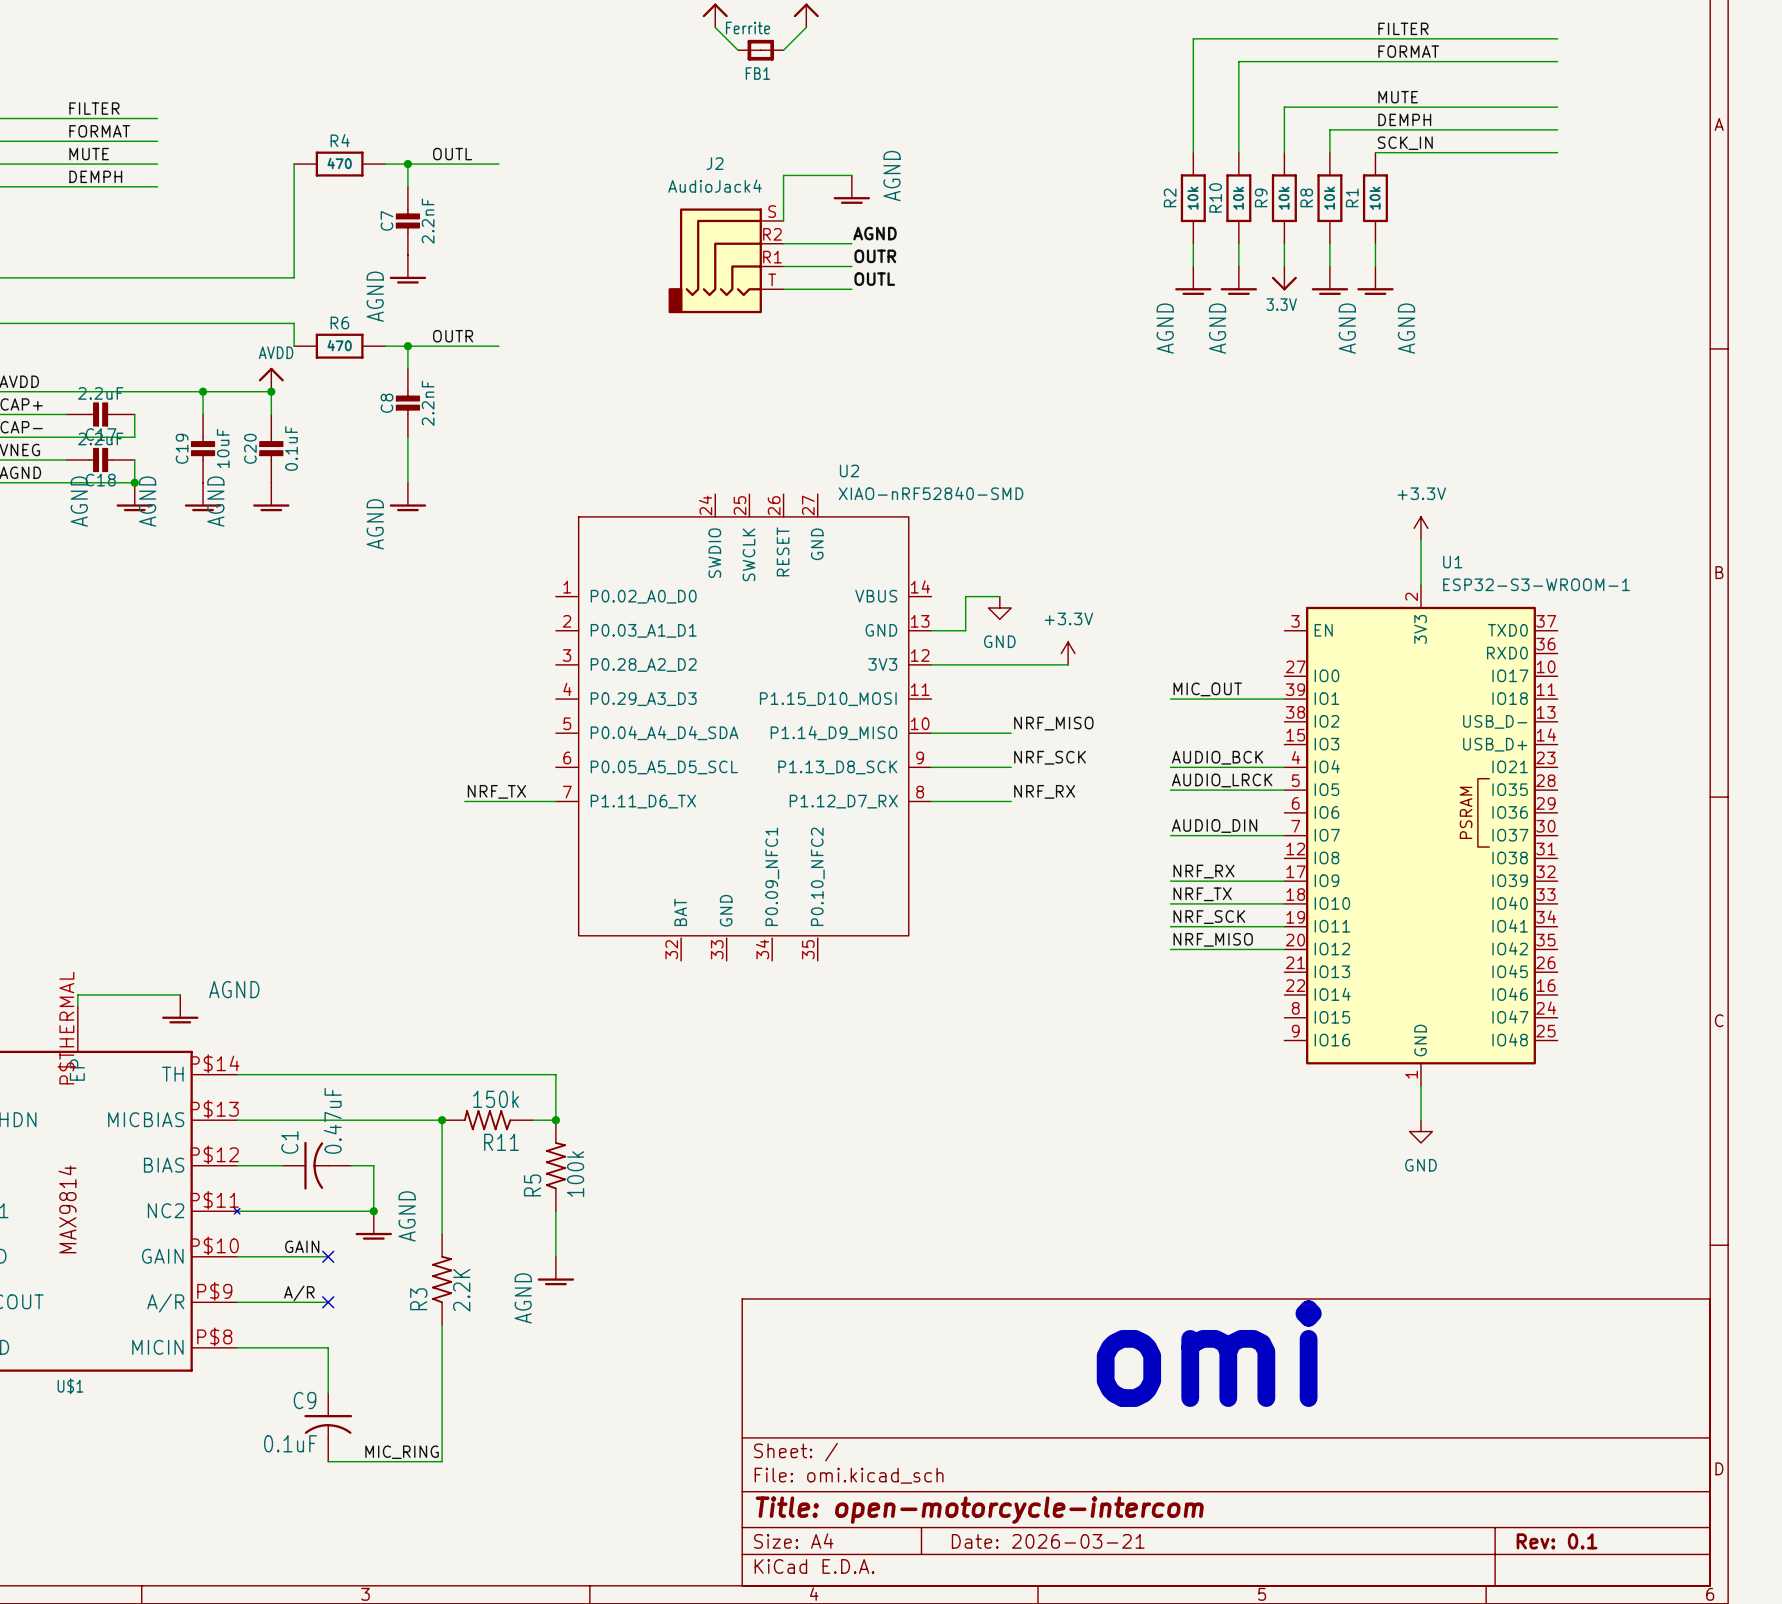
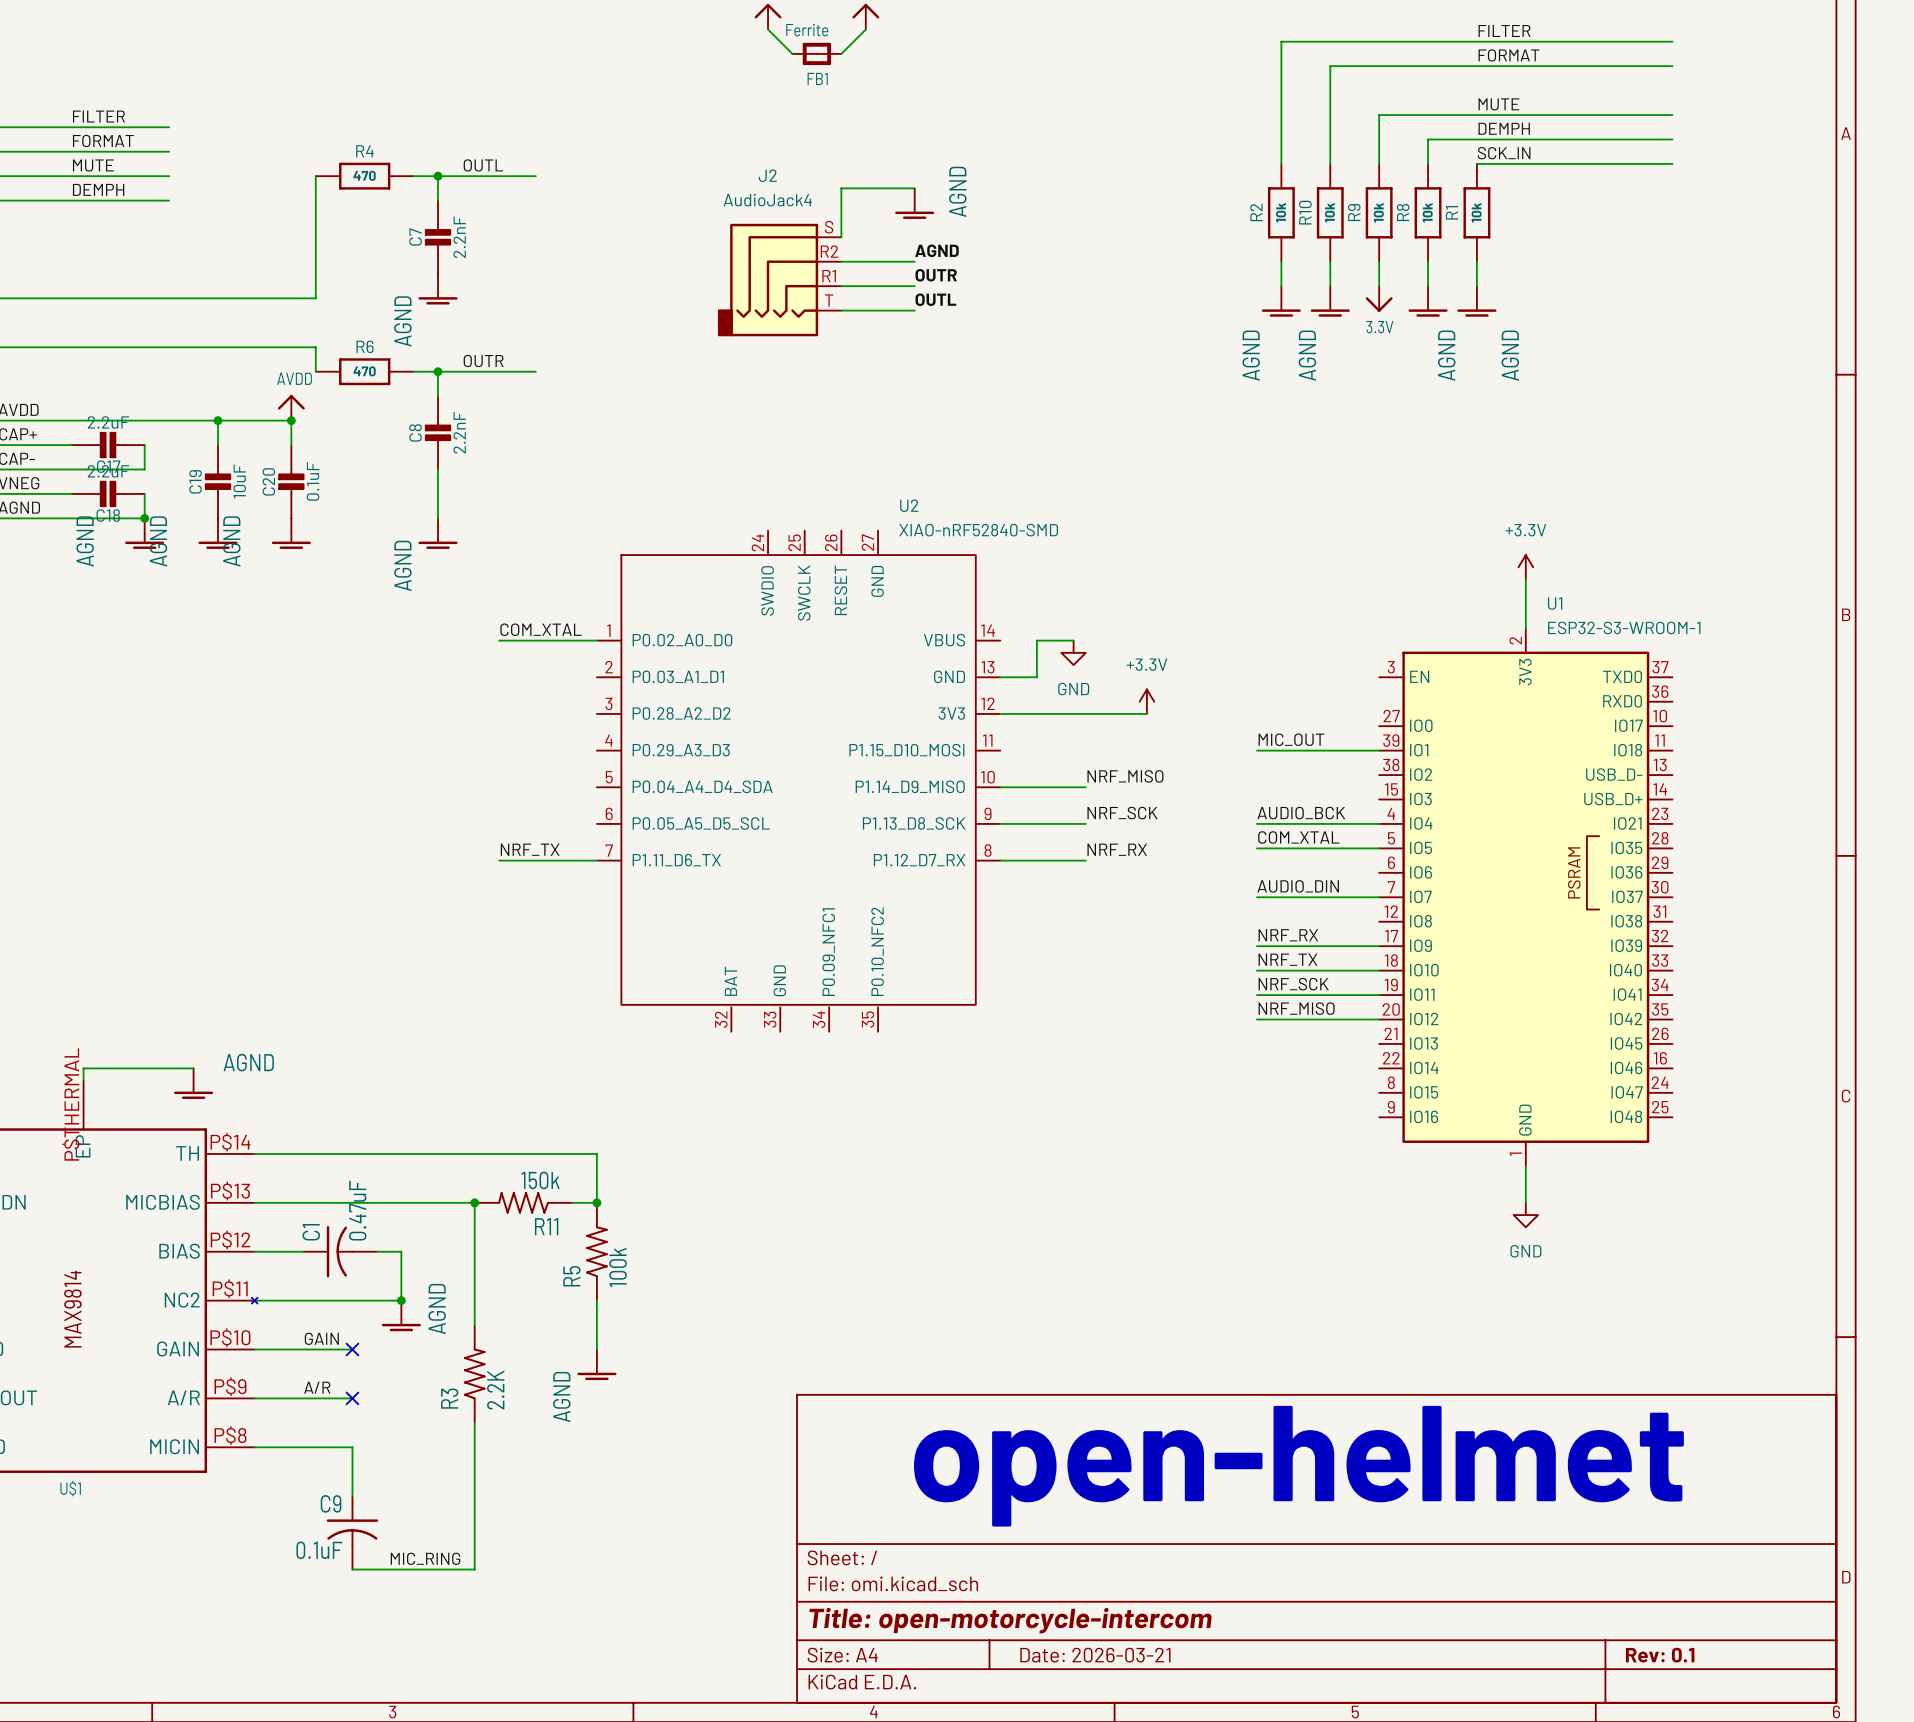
label: none -> COM_XTAL (541, 629)
wire: none -> (499, 640) (596, 640)
label: AUDIO_LRCK (1222, 780) -> COM_XTAL (1298, 837)
text: omi (1209, 1353) -> open-helmet (1298, 1466)

